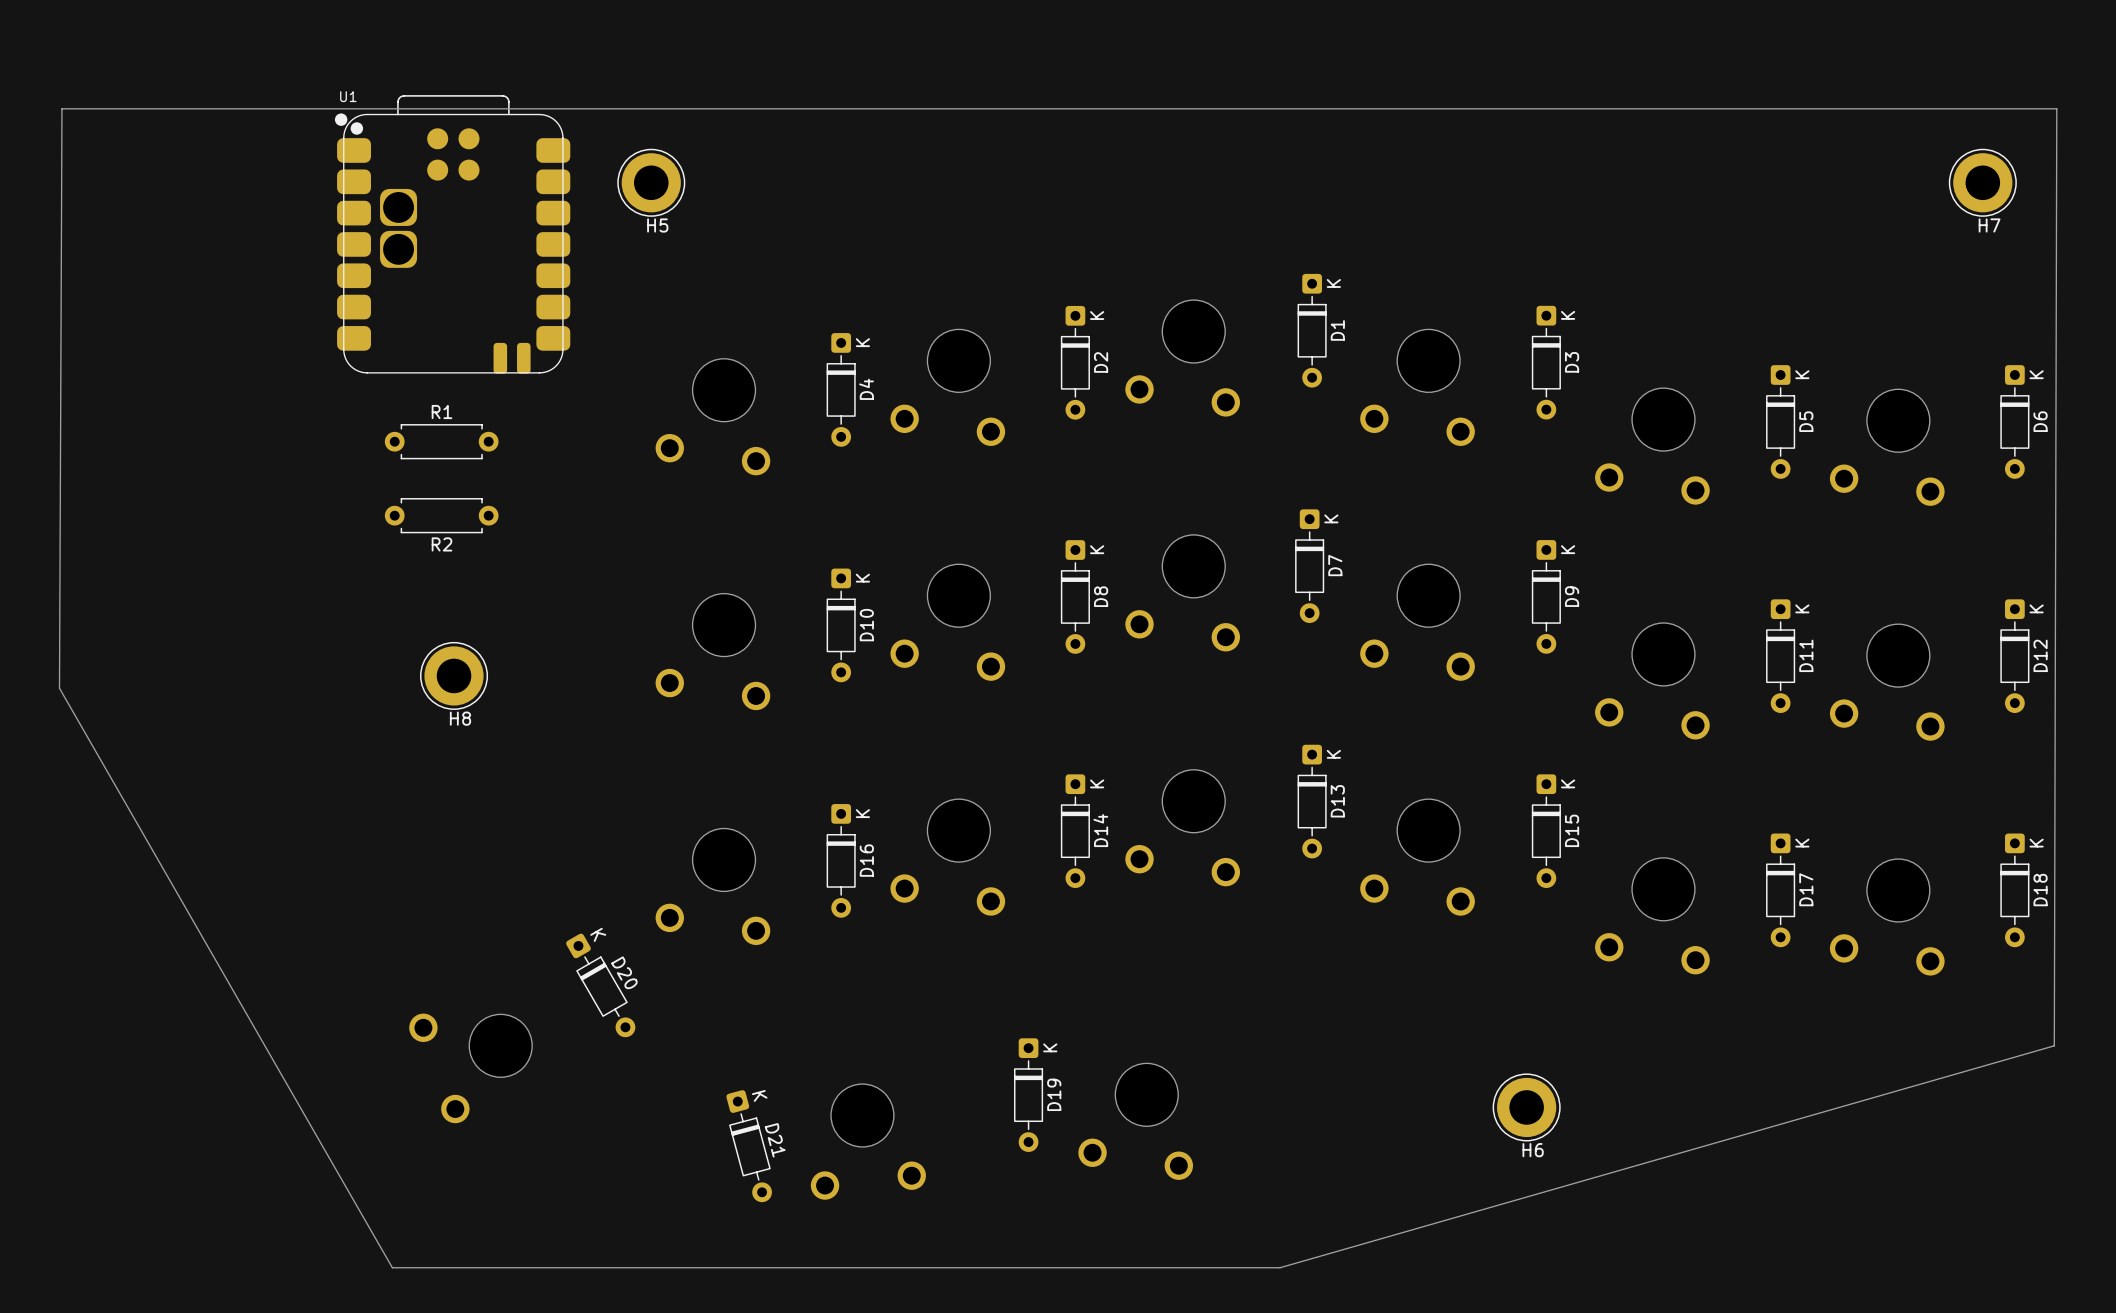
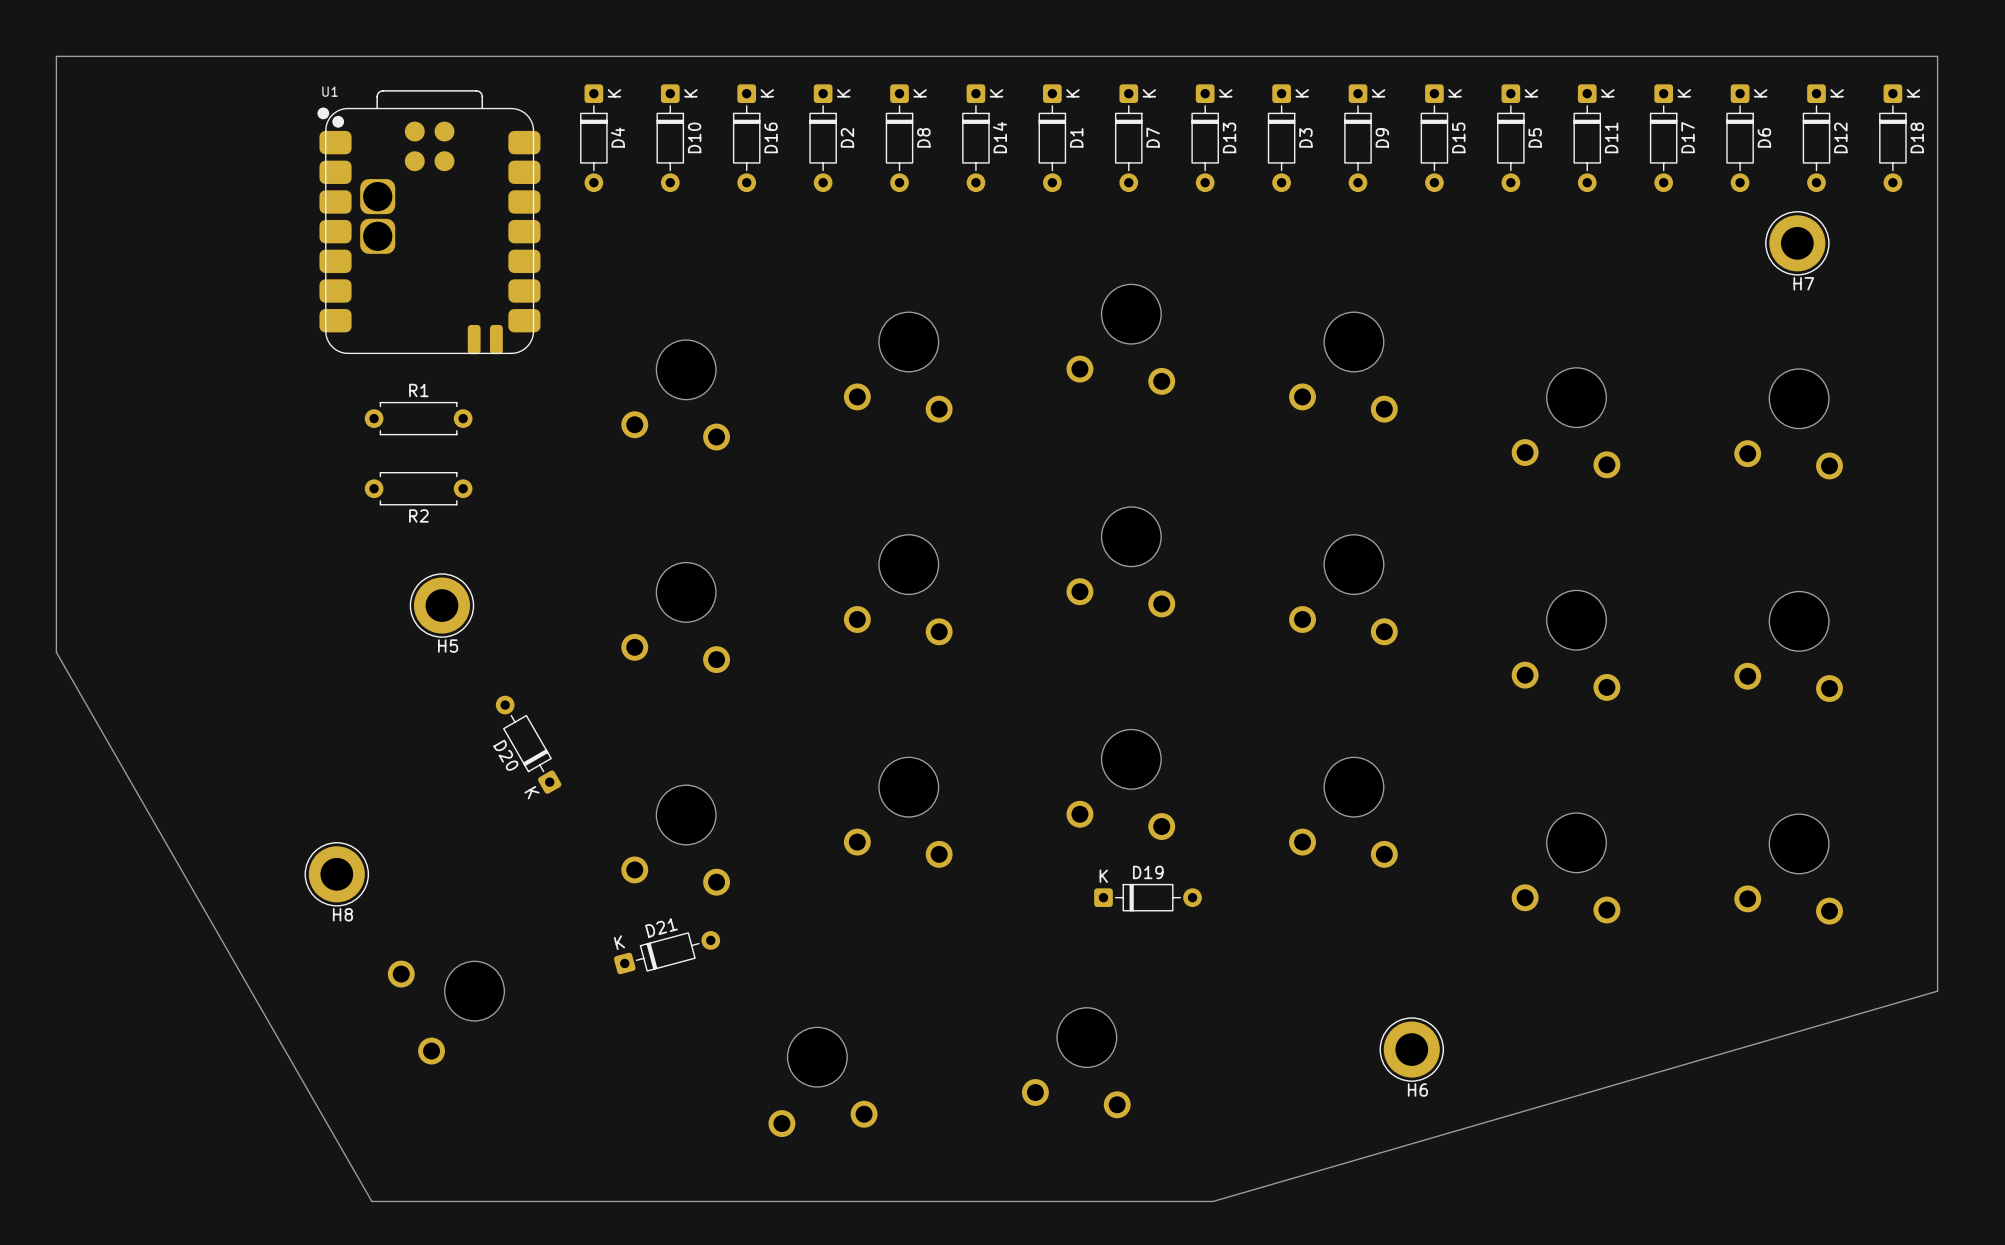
H5 position: (651, 182) -> (441, 605)
H7 position: (1982, 182) -> (1797, 243)
D1 position: (1312, 330) -> (1052, 138)
D2 position: (1075, 362) -> (823, 138)
D3 position: (1546, 362) -> (1281, 138)
D4 position: (841, 389) -> (593, 138)
D5 position: (1780, 421) -> (1510, 138)
D6 position: (2014, 421) -> (1740, 138)
D7 position: (1309, 566) -> (1128, 138)
D8 position: (1075, 596) -> (899, 138)
D9 position: (1546, 596) -> (1358, 138)
D10 position: (841, 625) -> (670, 138)
D11 position: (1780, 656) -> (1587, 138)
D12 position: (2014, 656) -> (1816, 138)
H8 position: (454, 675) -> (336, 874)
board edge: (59, 688) (61, 108) (2056, 108) (2054, 1045) (1280, 1267) -> (56, 652) (56, 56) (1937, 56) (1937, 991) (1213, 1201)
D13 position: (1312, 801) -> (1205, 138)
D14 position: (1075, 831) -> (975, 138)
D15 position: (1546, 831) -> (1434, 138)
D18 footprint: [2000, 833, 2030, 948] -> [1879, 84, 1907, 193]
D16 position: (841, 860) -> (746, 138)
D17 position: (1780, 890) -> (1663, 138)
D20 rotation: 0° (600, 985) -> 180° (528, 744)
D20 position: (600, 985) -> (528, 744)
D19 rotation: 0° (1028, 1095) -> 90° counterclockwise (1148, 897)
D19 position: (1028, 1095) -> (1148, 897)
H6 position: (1526, 1107) -> (1411, 1049)
D21 rotation: 0° (749, 1146) -> 90° counterclockwise (667, 952)
D21 position: (749, 1146) -> (667, 952)

